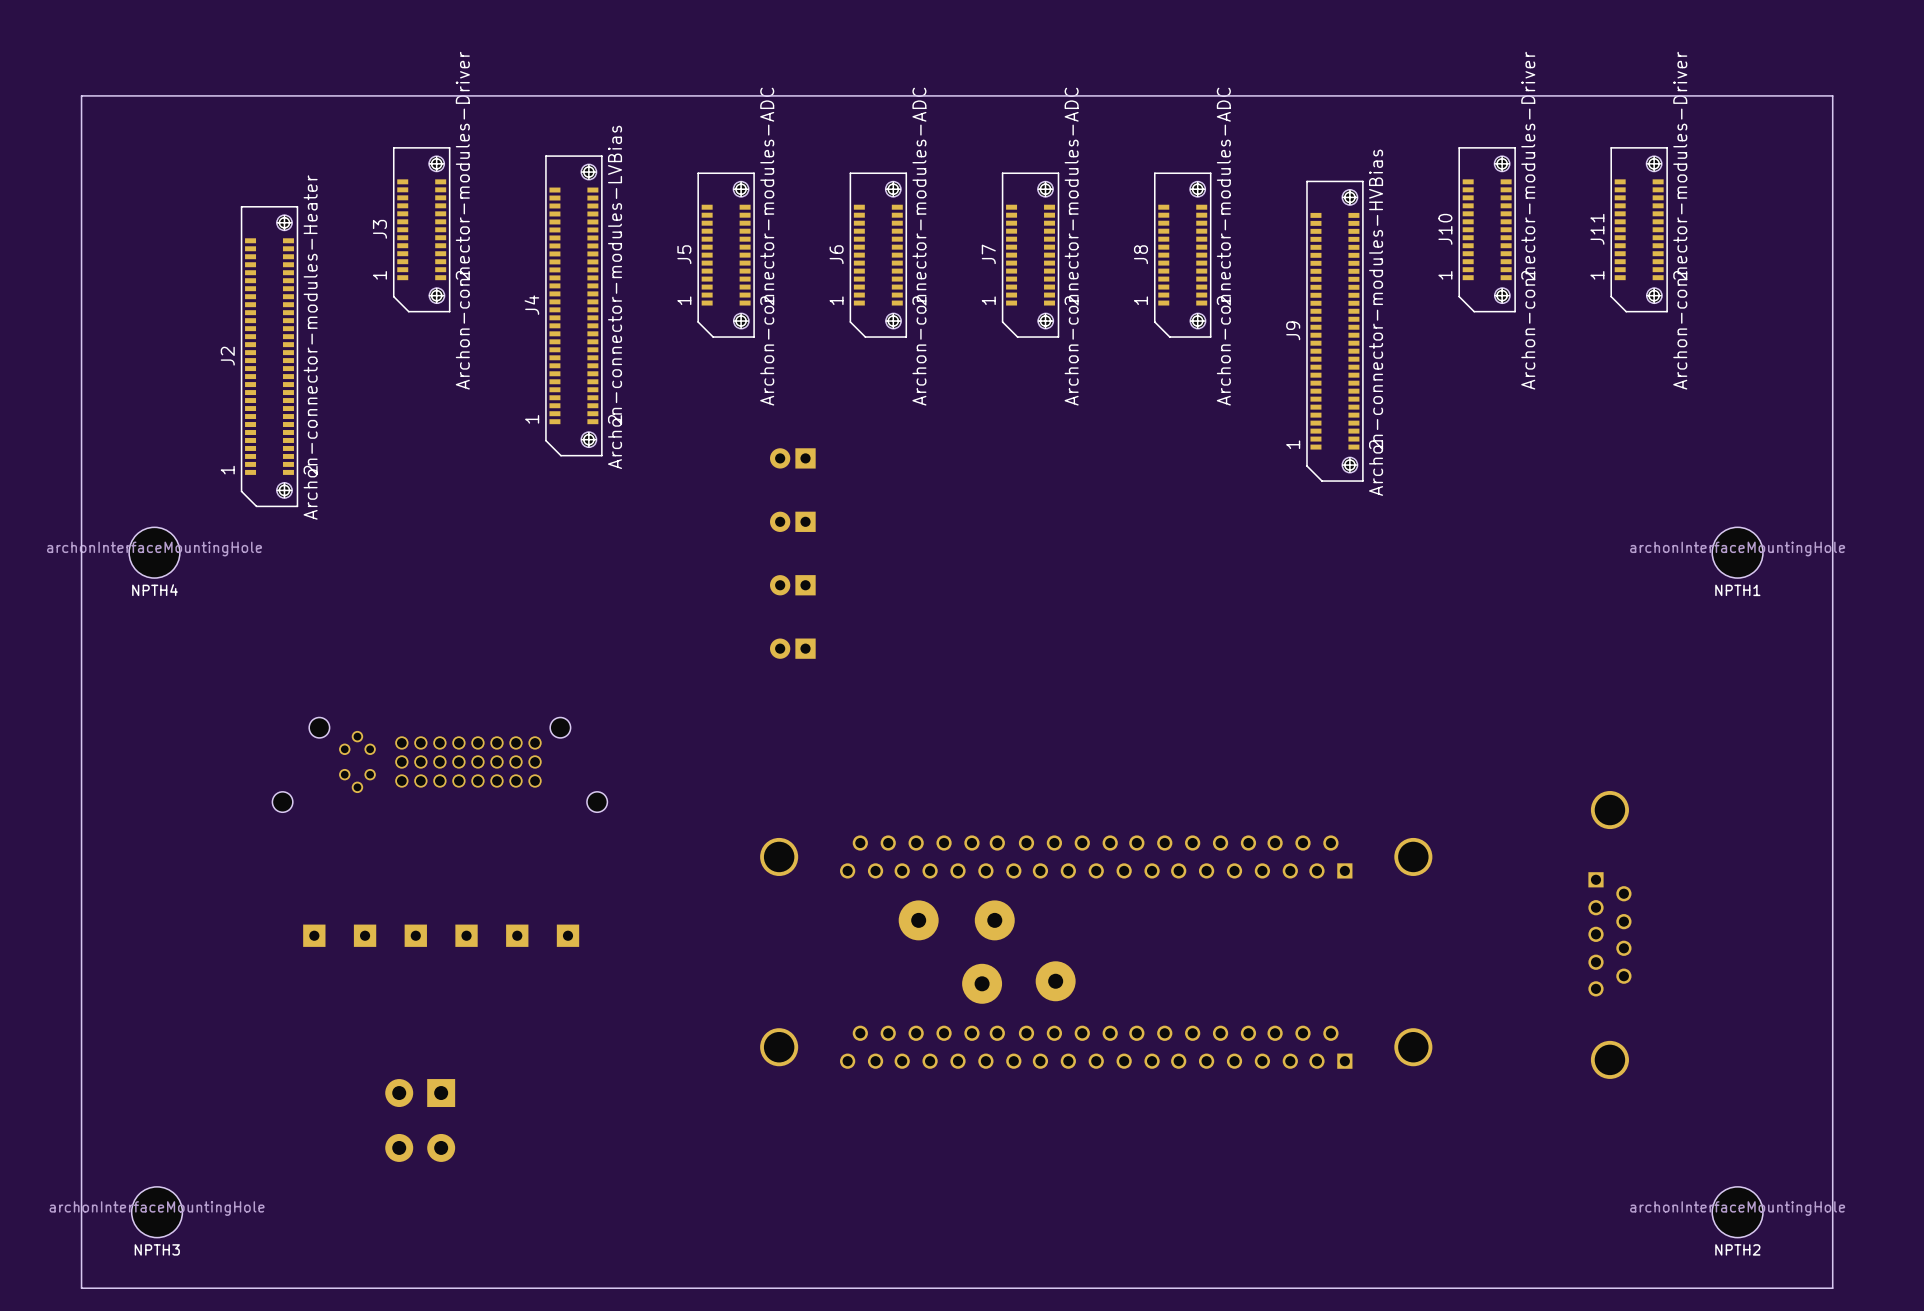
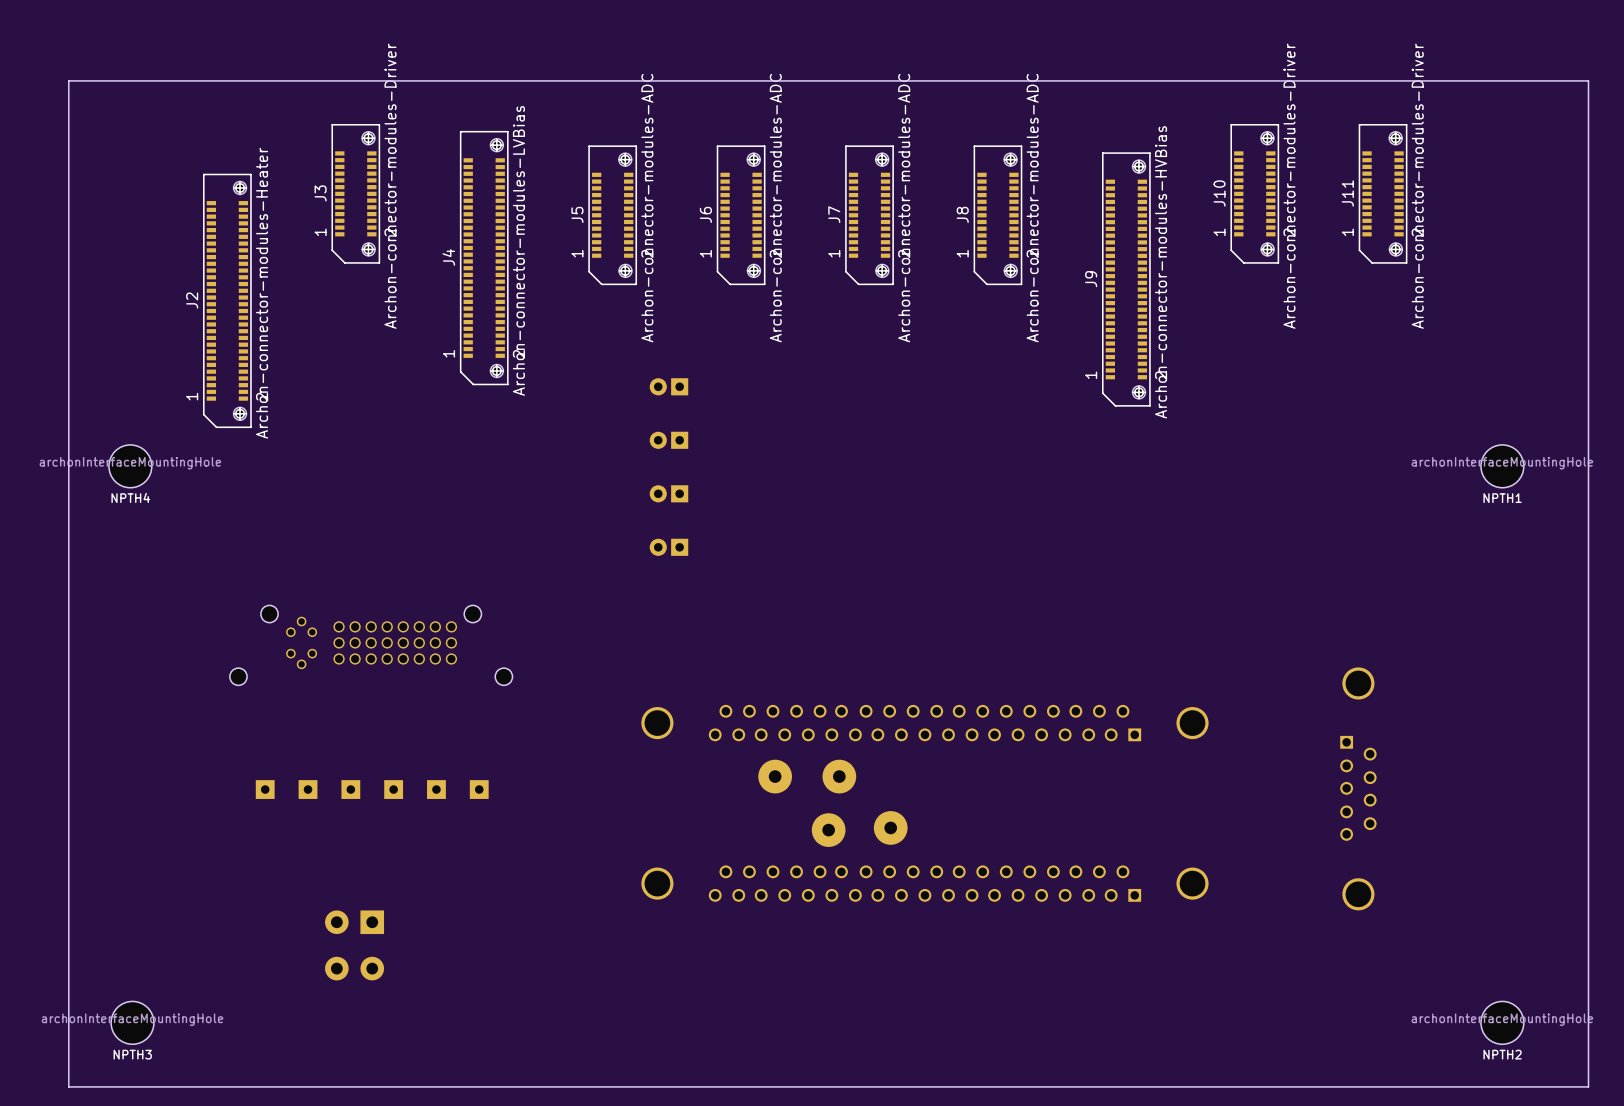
board edge: (1832, 95) (1832, 1288) -> (1546, 80) (1588, 80) (1588, 1086) (1546, 1086)
NPTH1 position: (1737, 552) -> (1502, 466)
NPTH2 position: (1737, 1212) -> (1502, 1022)

